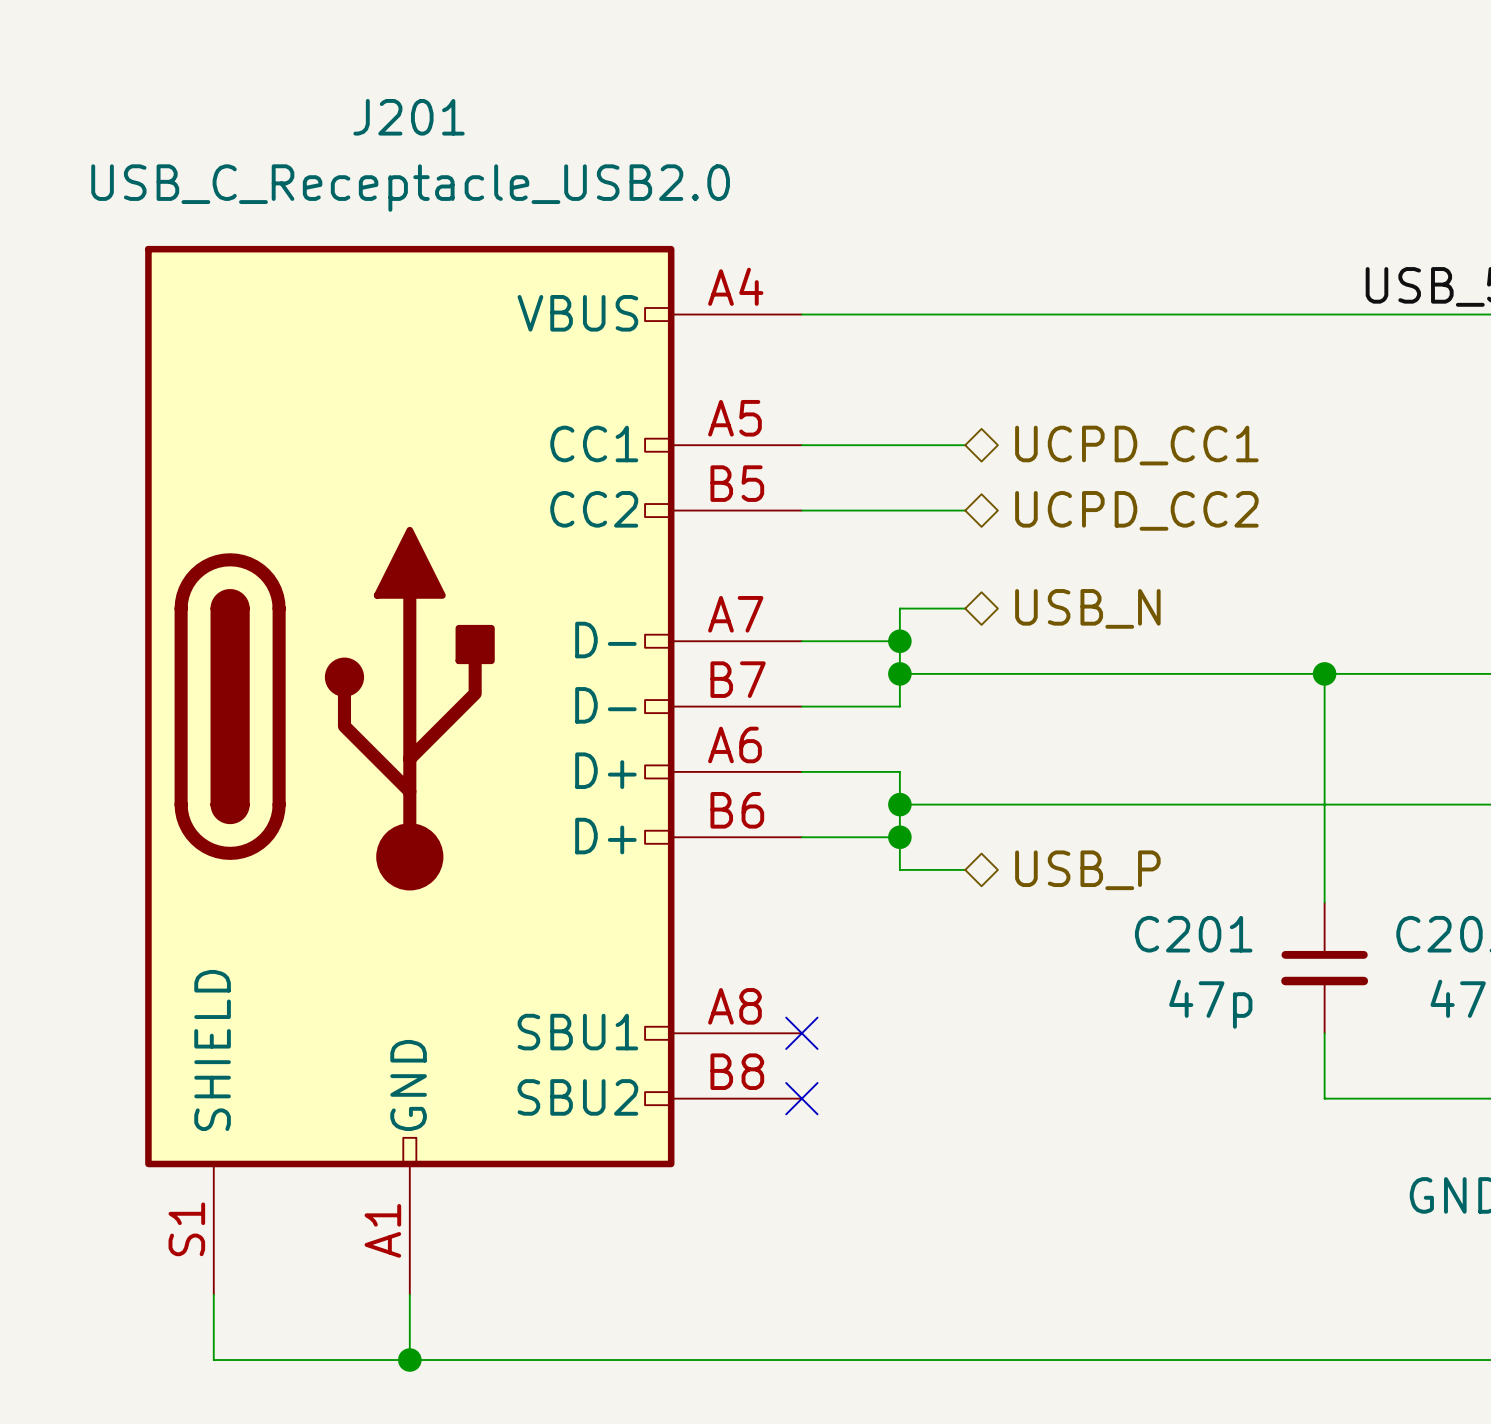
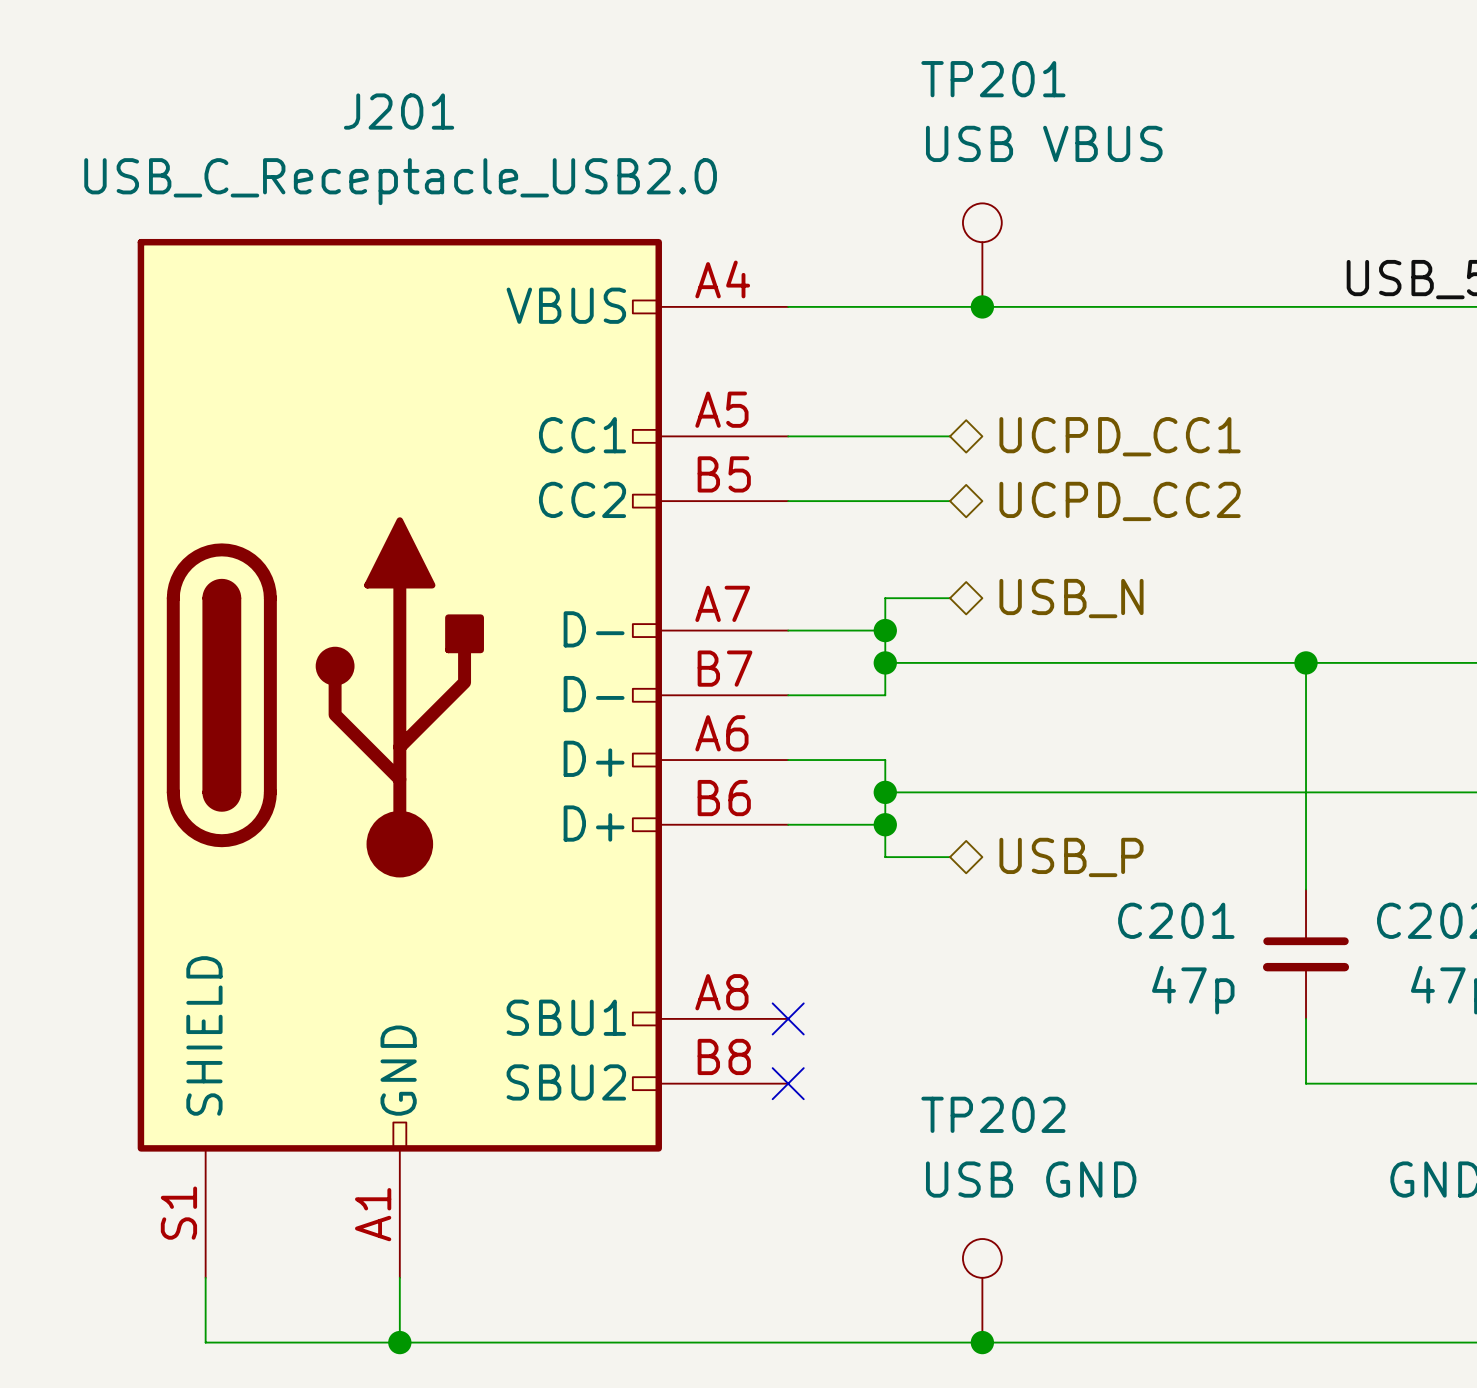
TP201: none -> USB VBUS (982, 255)
junction: none -> (982, 306)
TP202: none -> USB GND (982, 1290)
junction: none -> (982, 1342)

